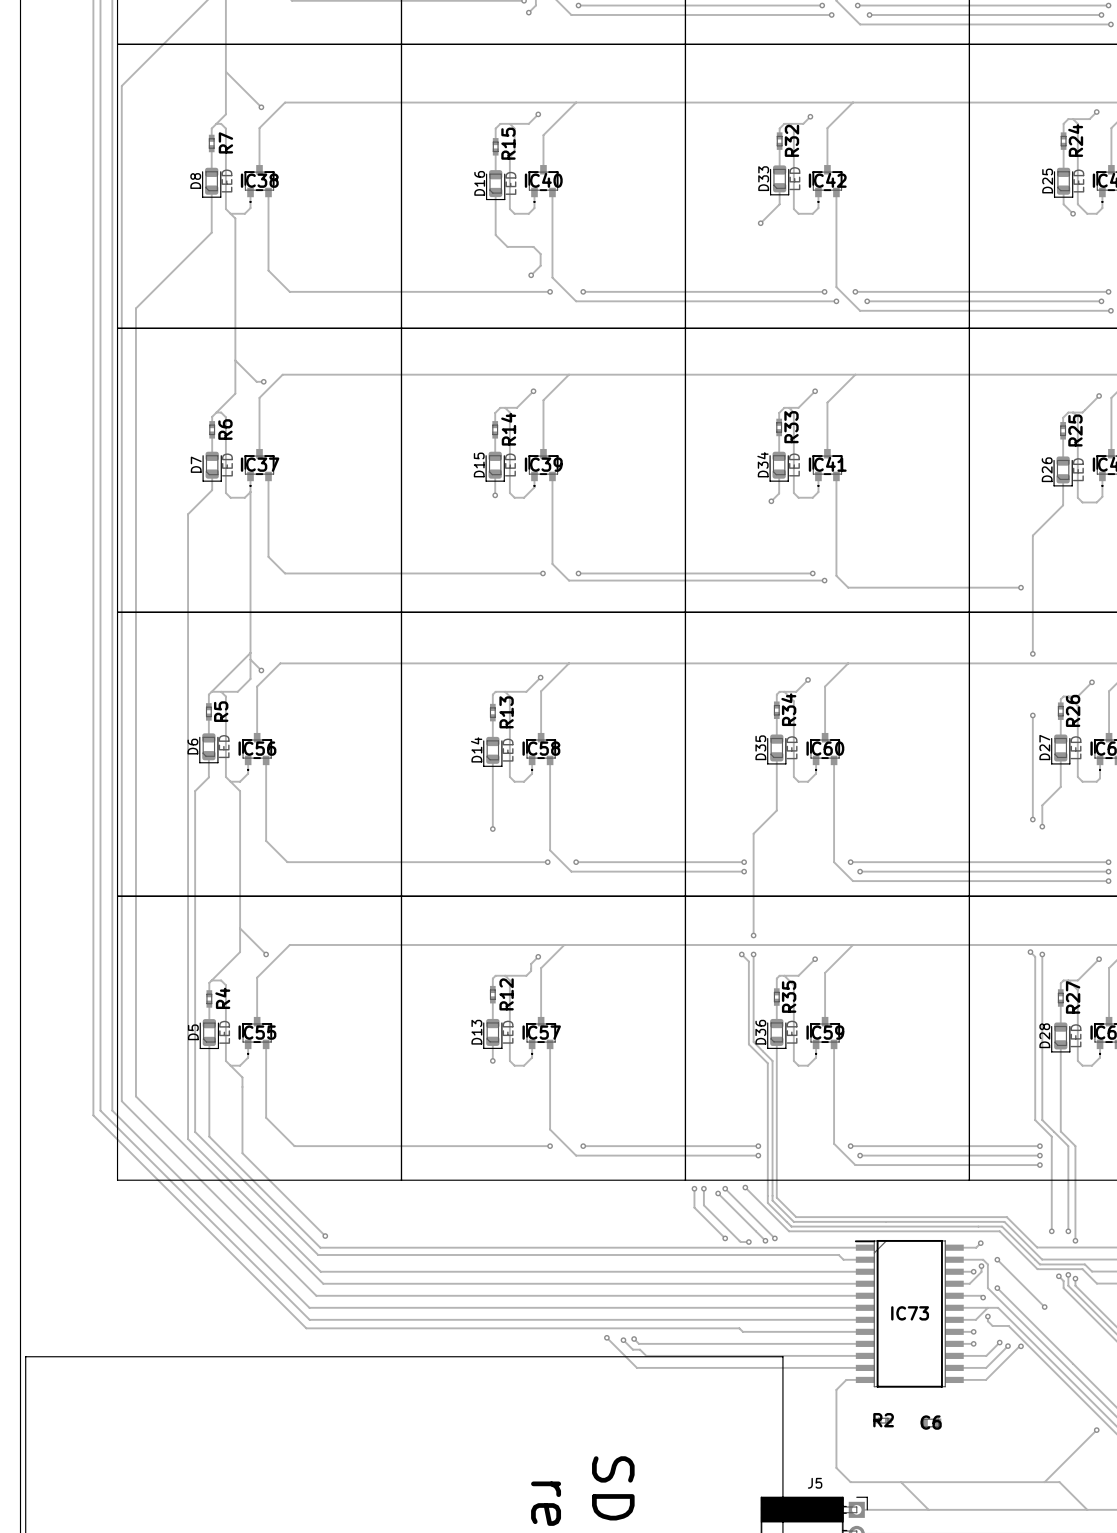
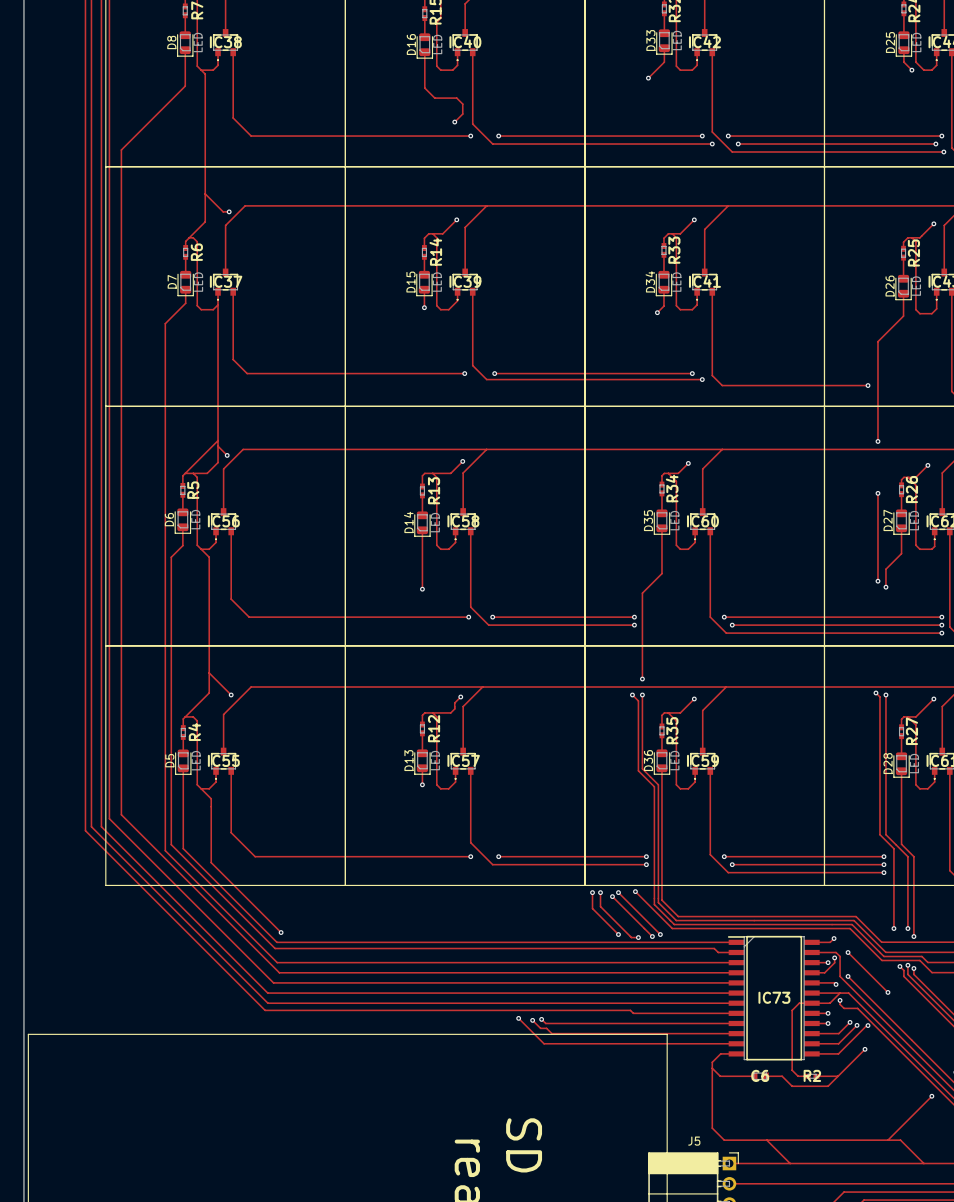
track: none -> (811, 1003) (799, 1003) (792, 1010) (792, 1070) (798, 1076) (807, 1076)
track: none -> (865, 1049) (828, 1086) (792, 1086) (782, 1076) (765, 1076)
via: none -> (865, 1049)
track: none -> (712, 1068) (720, 1076) (754, 1076)
track: none -> (816, 1076) (838, 1076)
R2 position: (883, 1420) -> (812, 1076)
C6 position: (931, 1423) -> (760, 1076)

